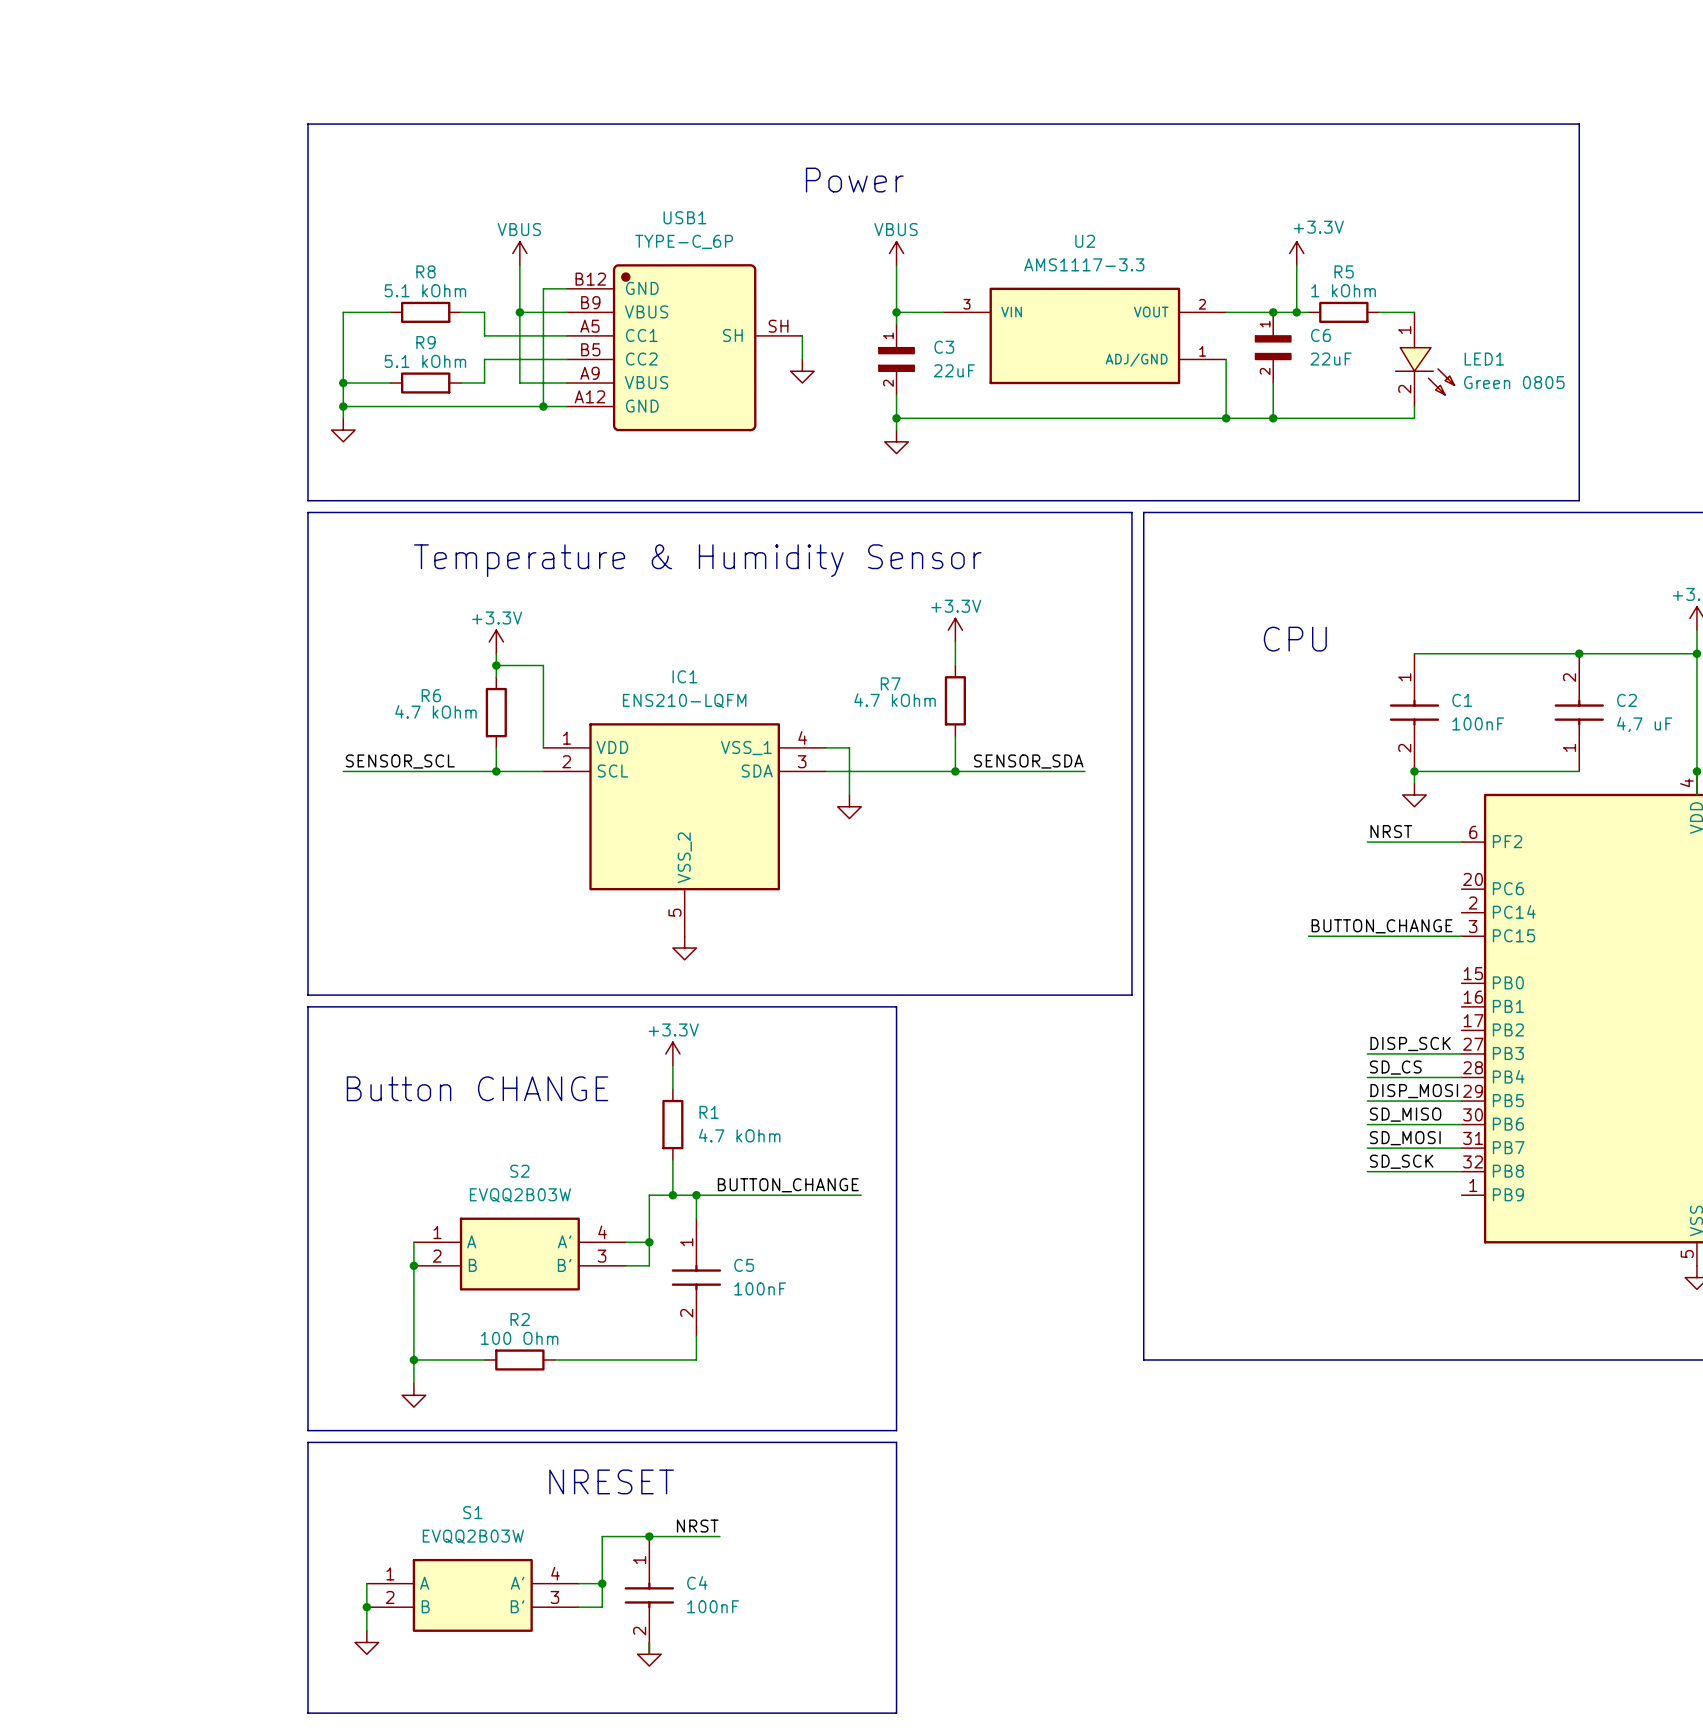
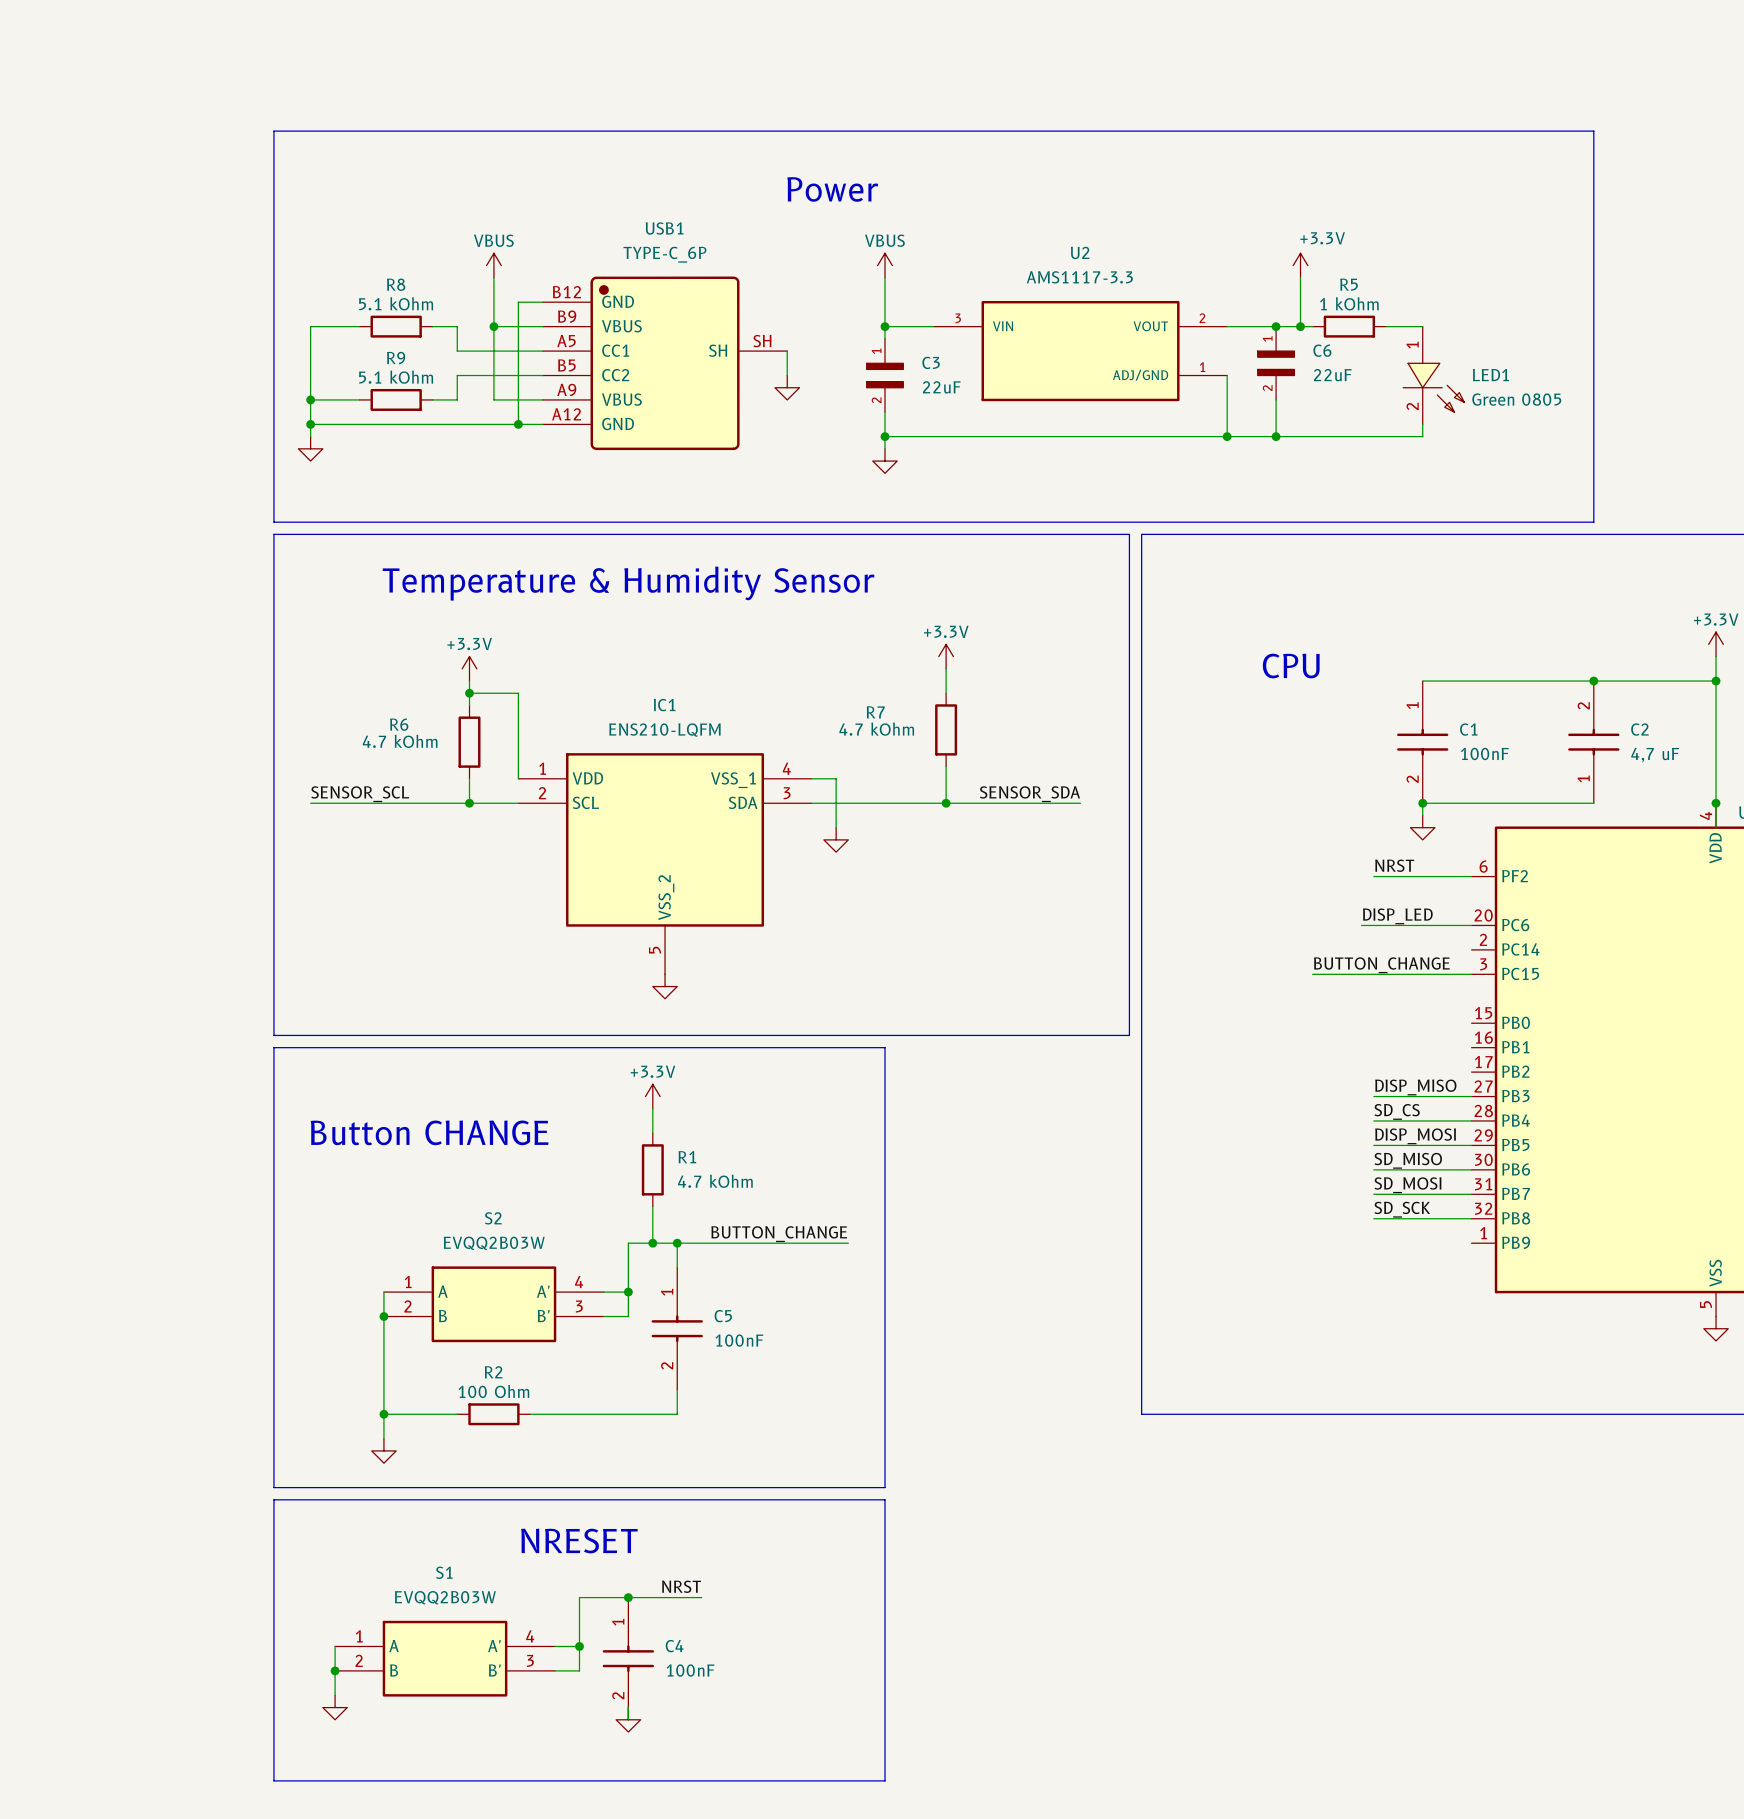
label: none -> DISP_LED (1397, 916)
wire: none -> (1361, 925) (1471, 925)
label: DISP_SCK (1410, 1044) -> DISP_MISO (1415, 1087)

